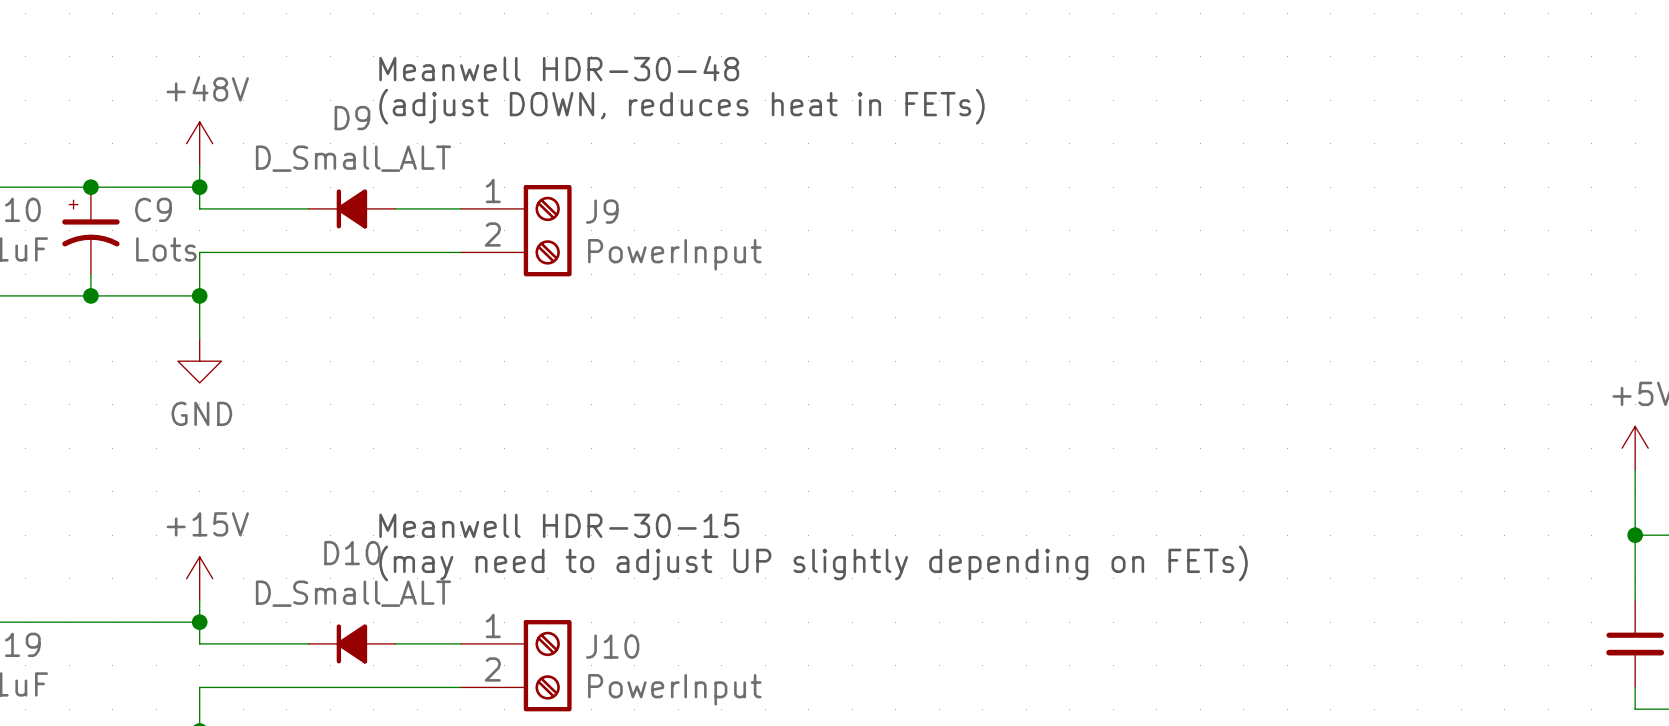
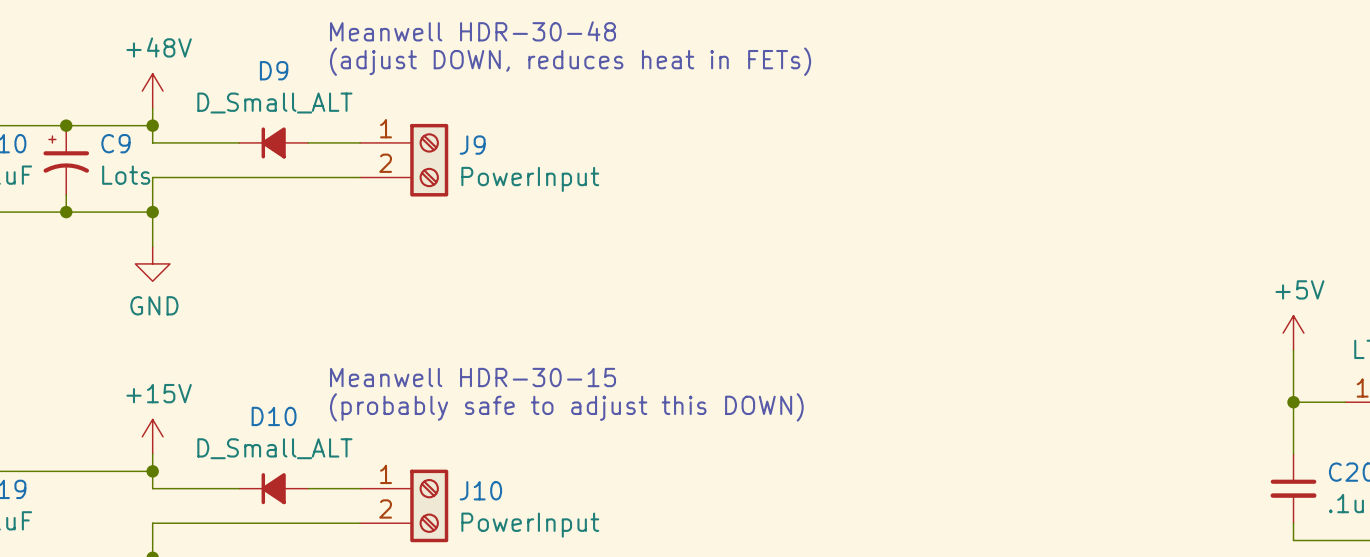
text position: Meanwell HDR-30-48 (559, 68) -> Meanwell HDR-30-48 (473, 31)
text position: (adjust DOWN, reduces heat in FETs) (681, 106) -> (adjust DOWN, reduces heat in FETs) (570, 61)
text position: Meanwell HDR-30-15 (559, 525) -> Meanwell HDR-30-15 (473, 377)
text: none -> (probably safe to adjust this DOWN) (566, 407)
text: (may need to adjust UP slightly depending on FETs) (813, 563) -> none

